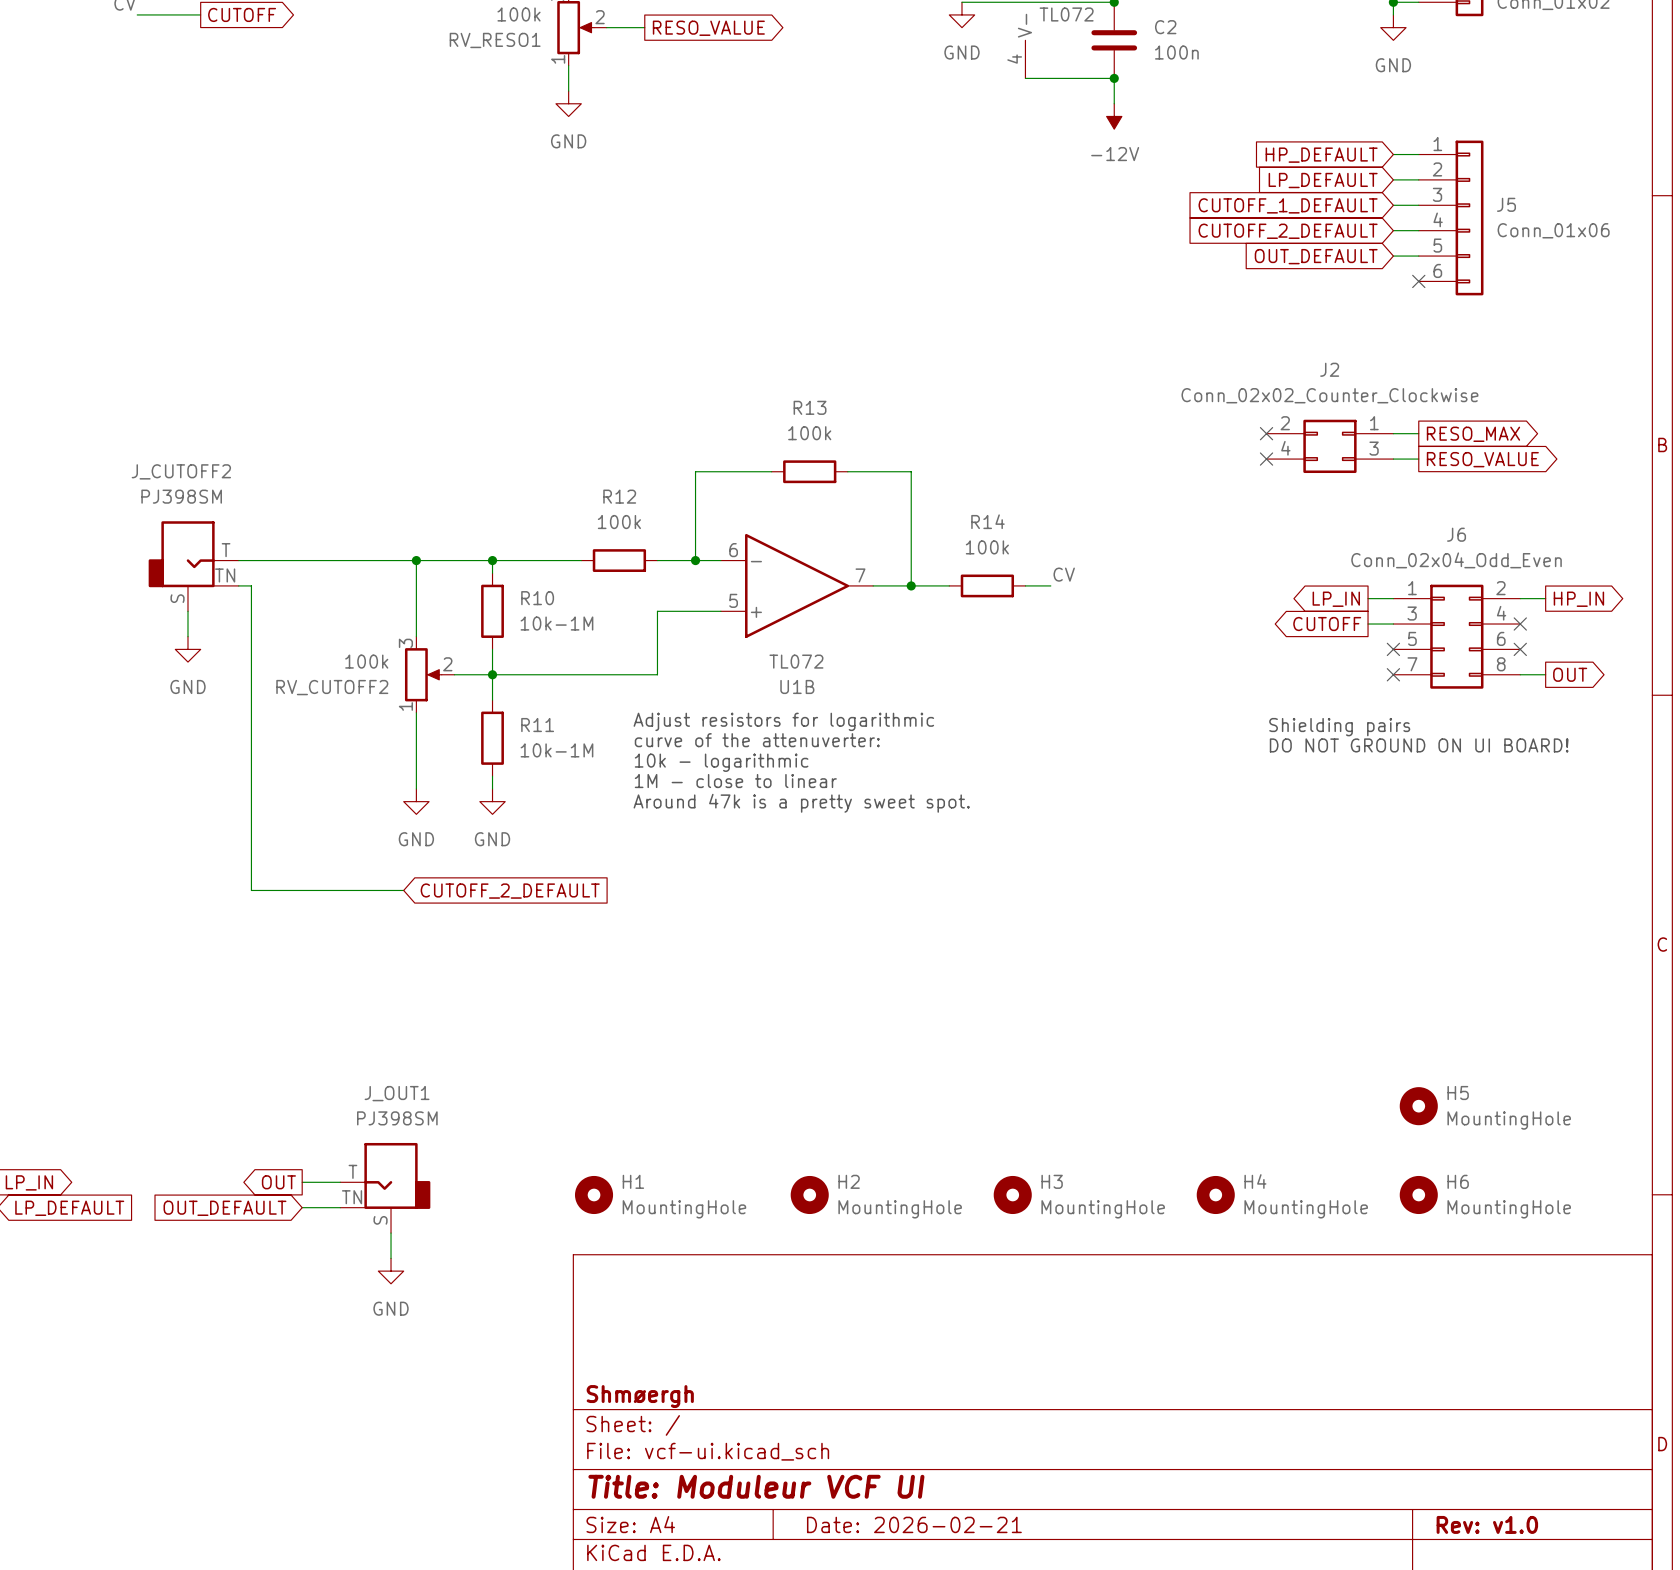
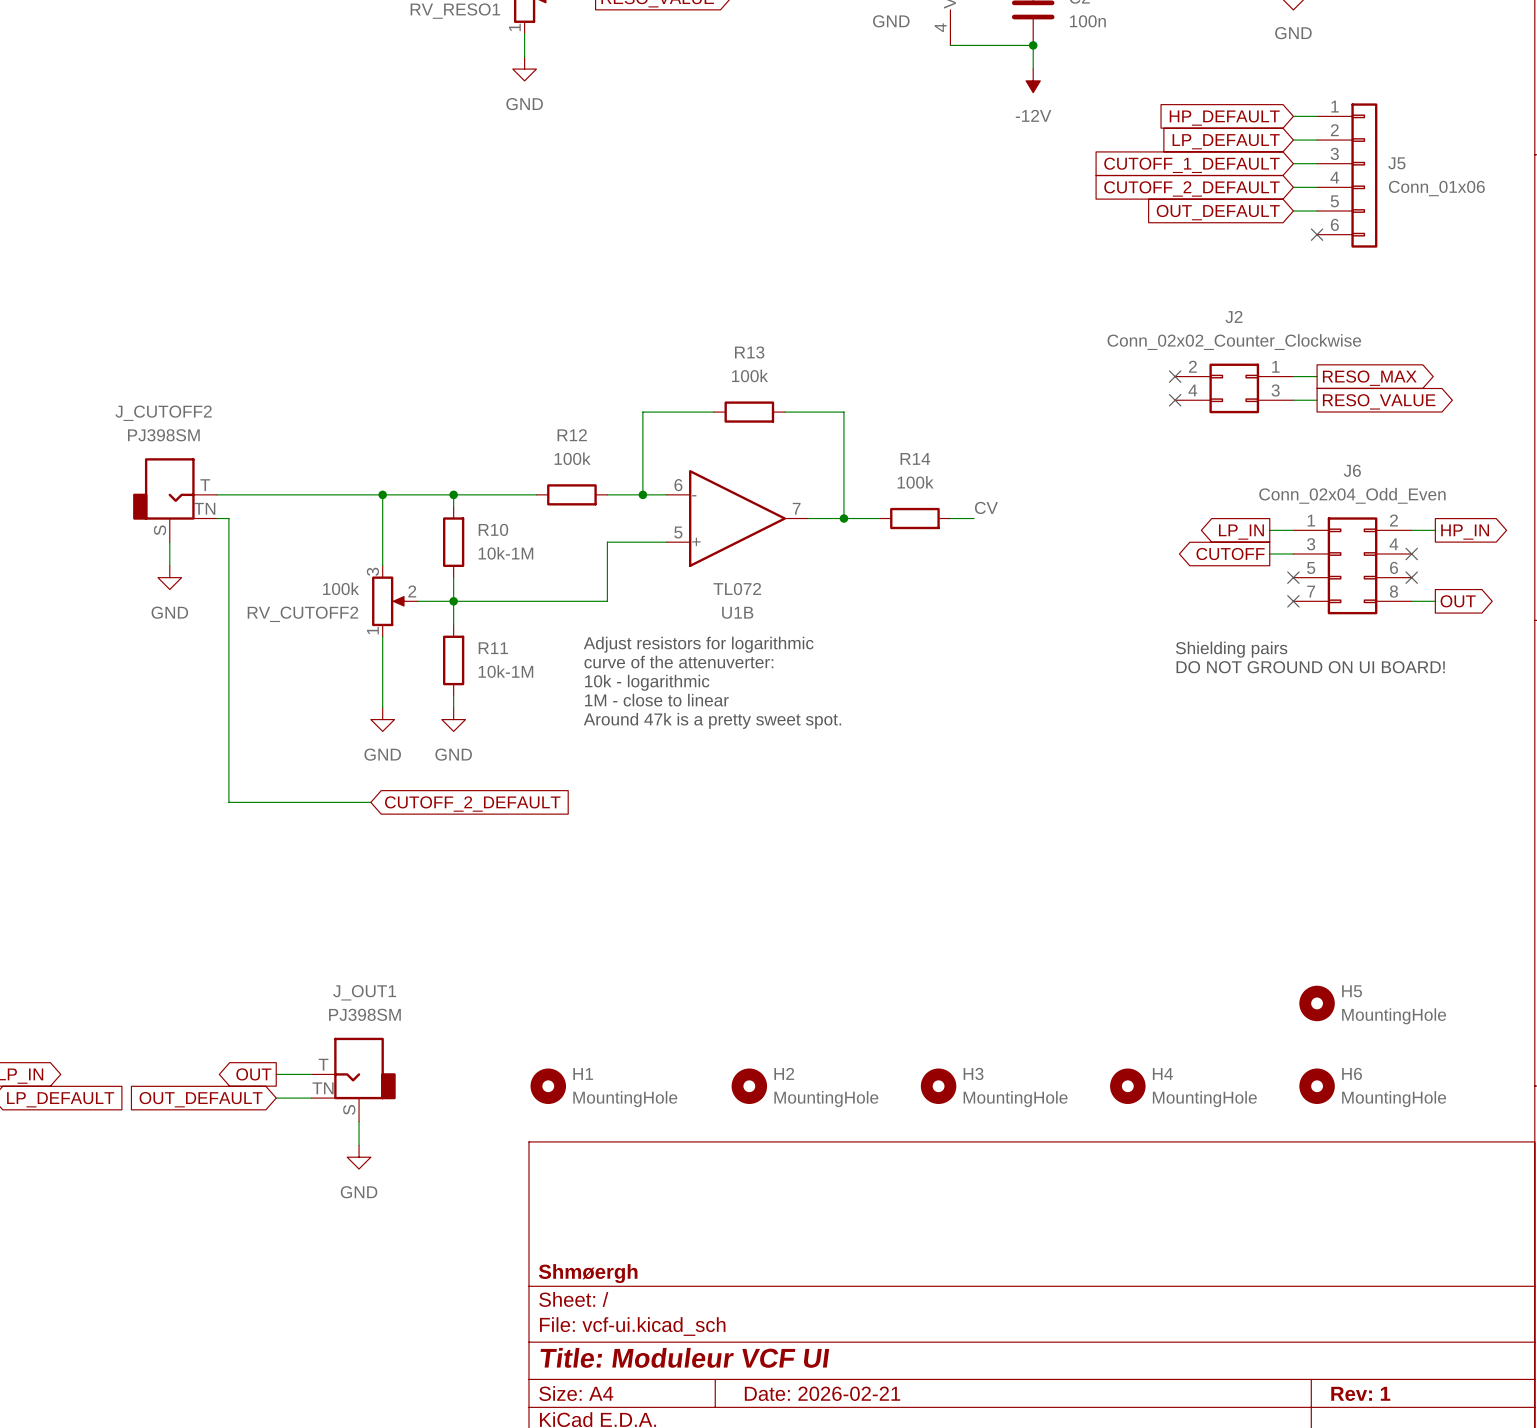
title block: Rev: v1.0 (1487, 1524) -> Rev: 1 (1360, 1393)

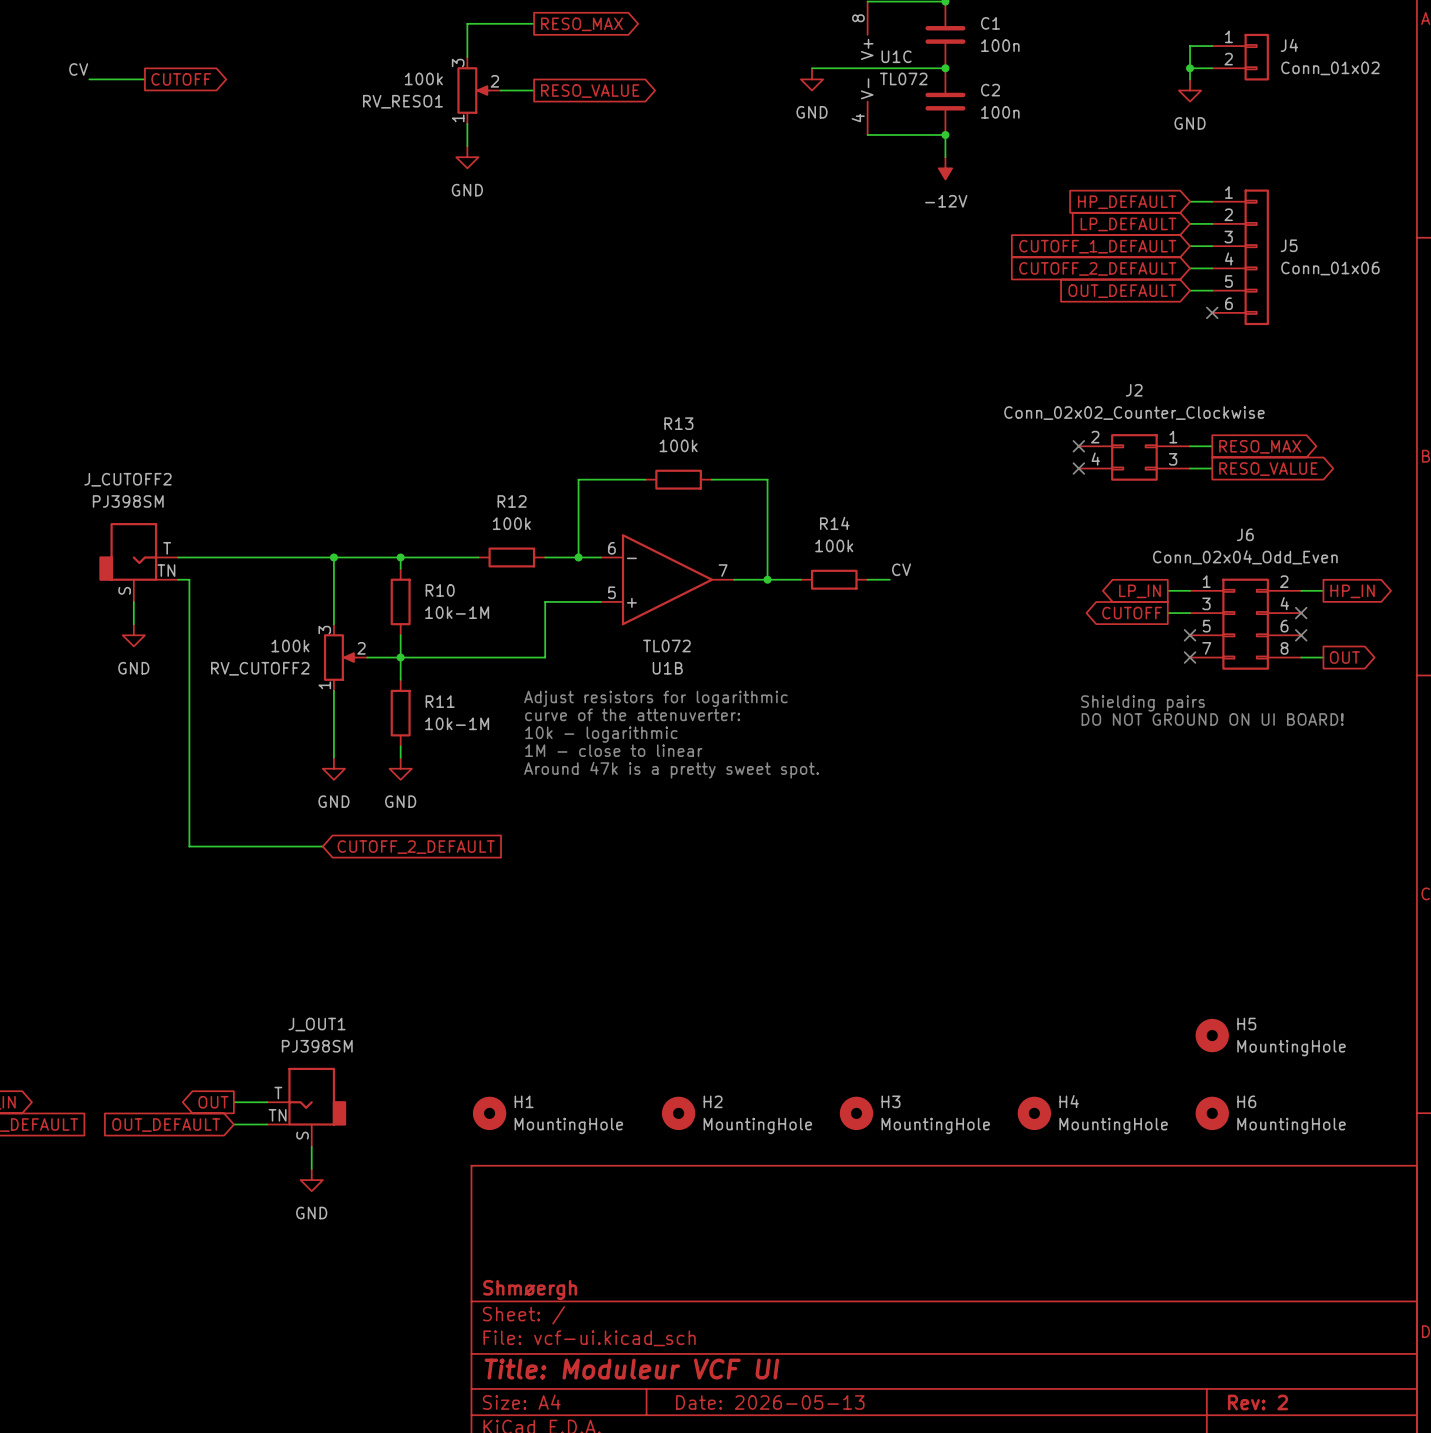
title block: Date: 2026-02-21 (822, 1393) -> Date: 2026-05-13 (770, 1402)
title block: Rev: 1 (1360, 1393) -> Rev: 2 (1257, 1402)

